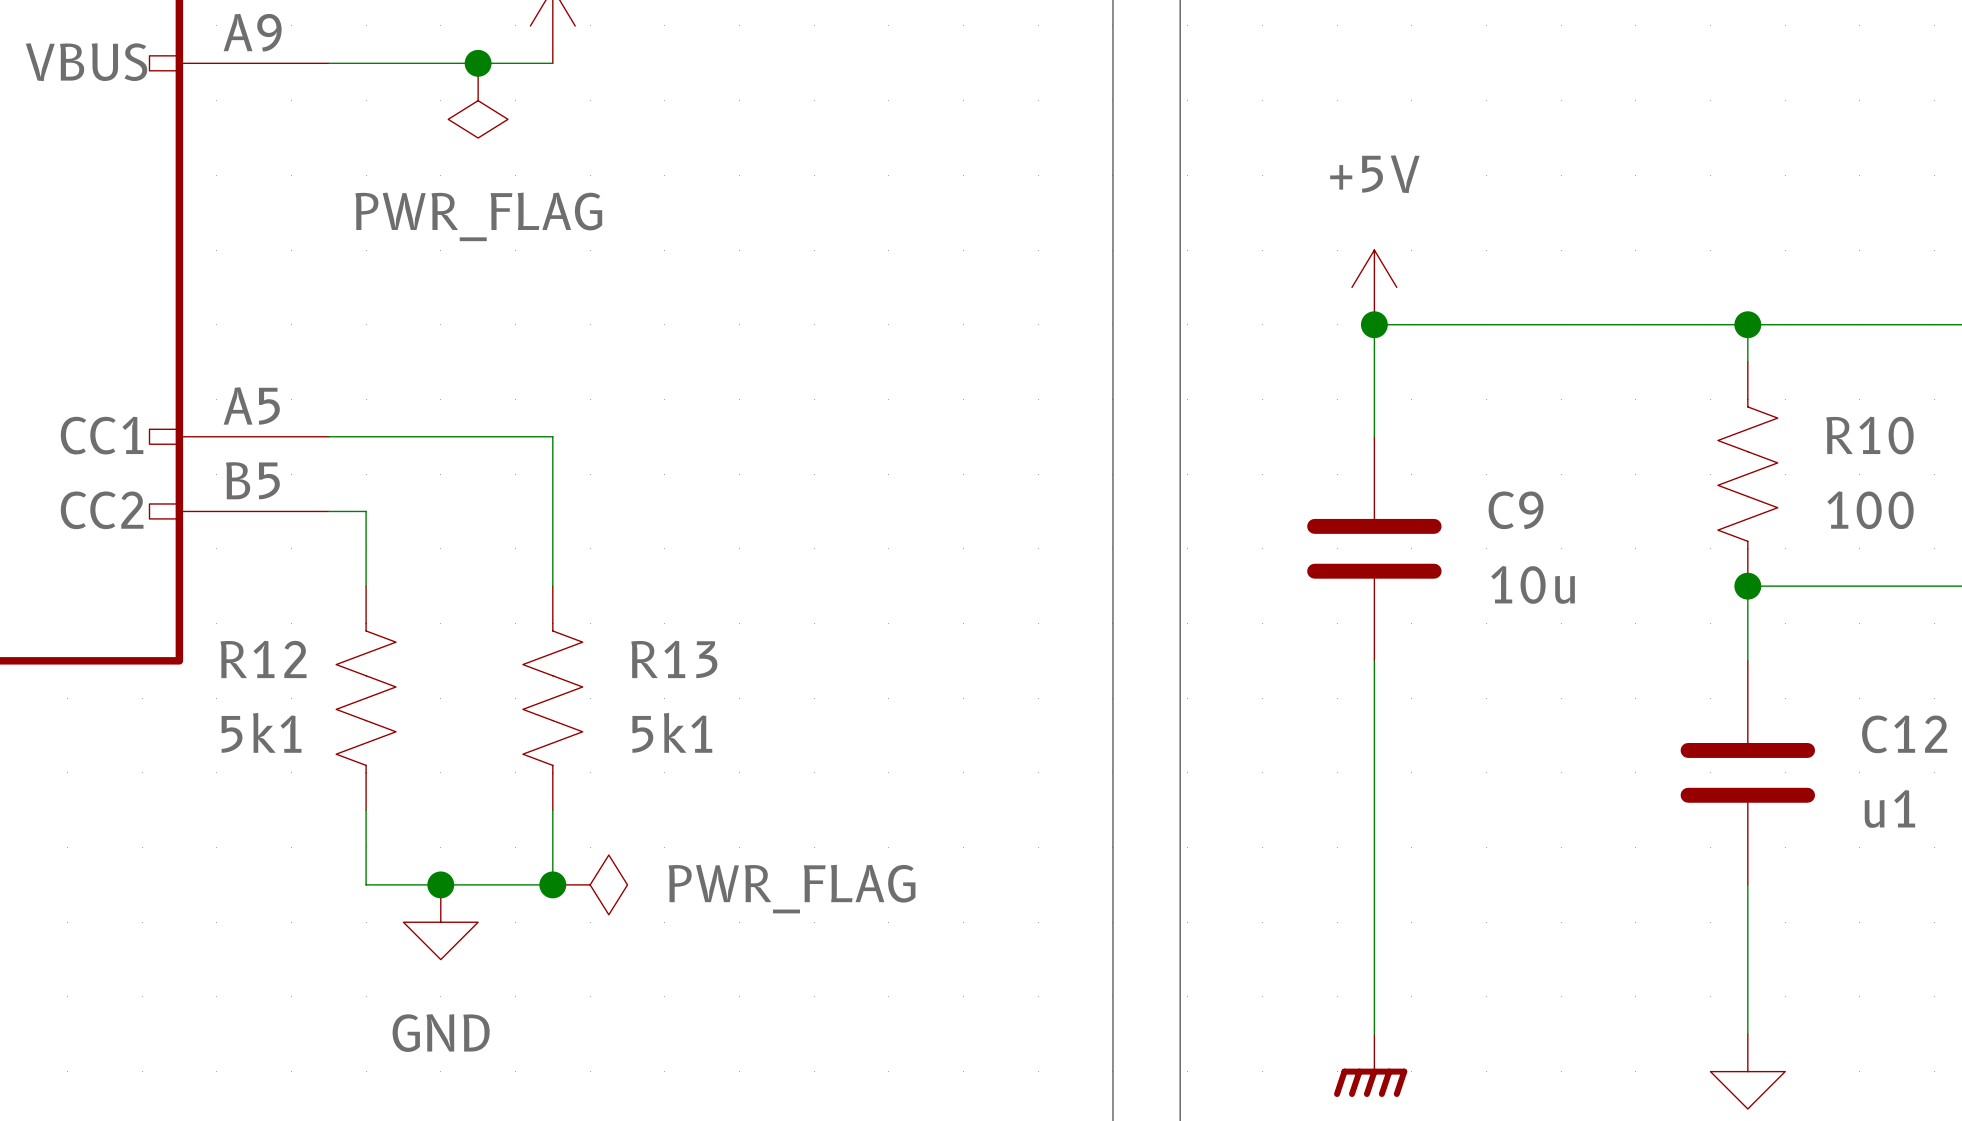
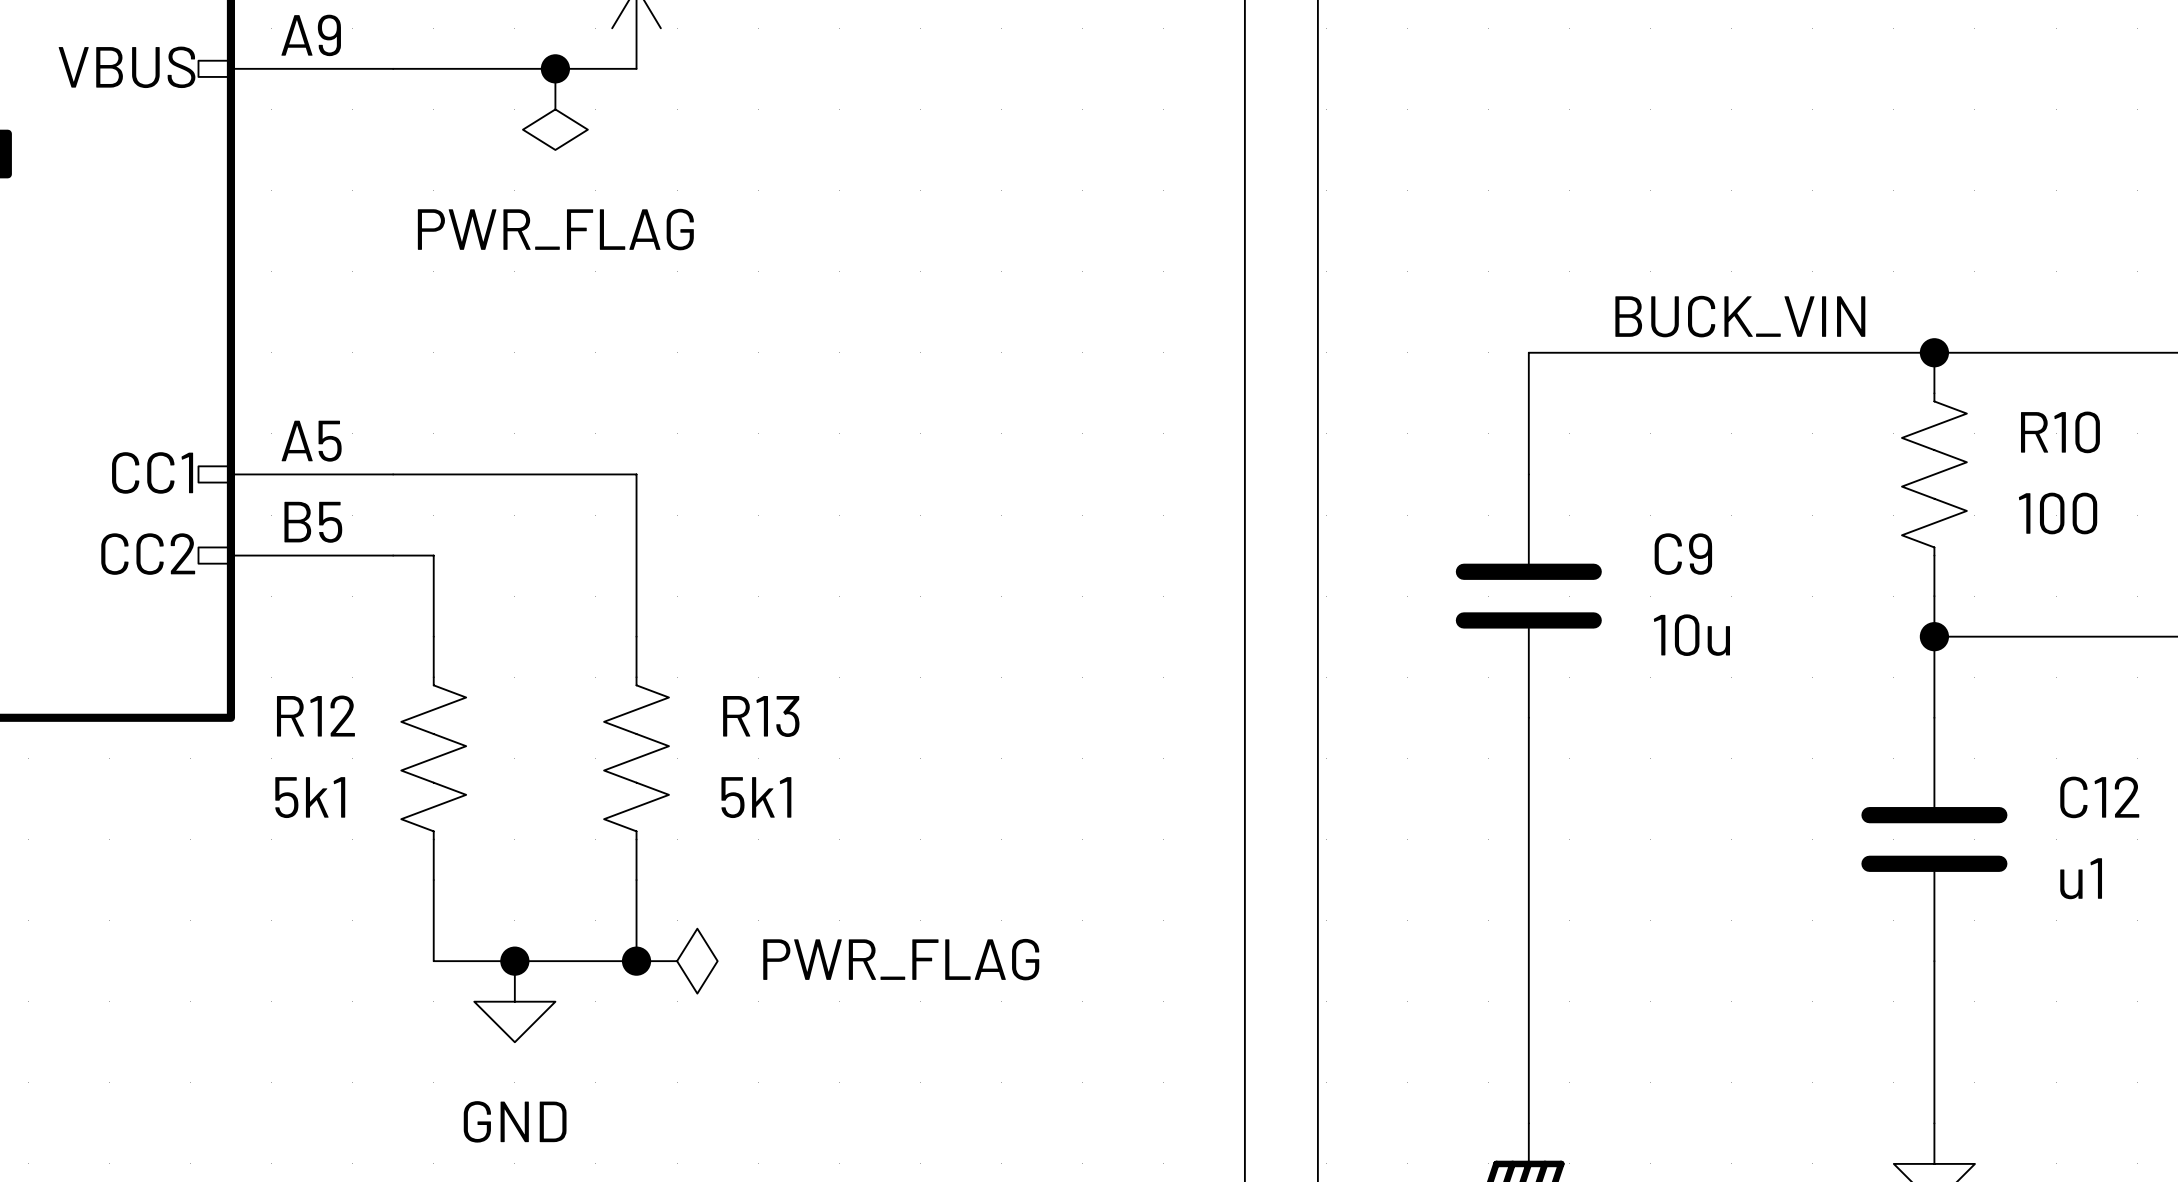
power symbol: +5V (1374, 287) -> none
label: none -> BUCK_VIN (1740, 316)
junction: (1374, 324) -> none
R10 position: (1747, 474) -> (1934, 474)

